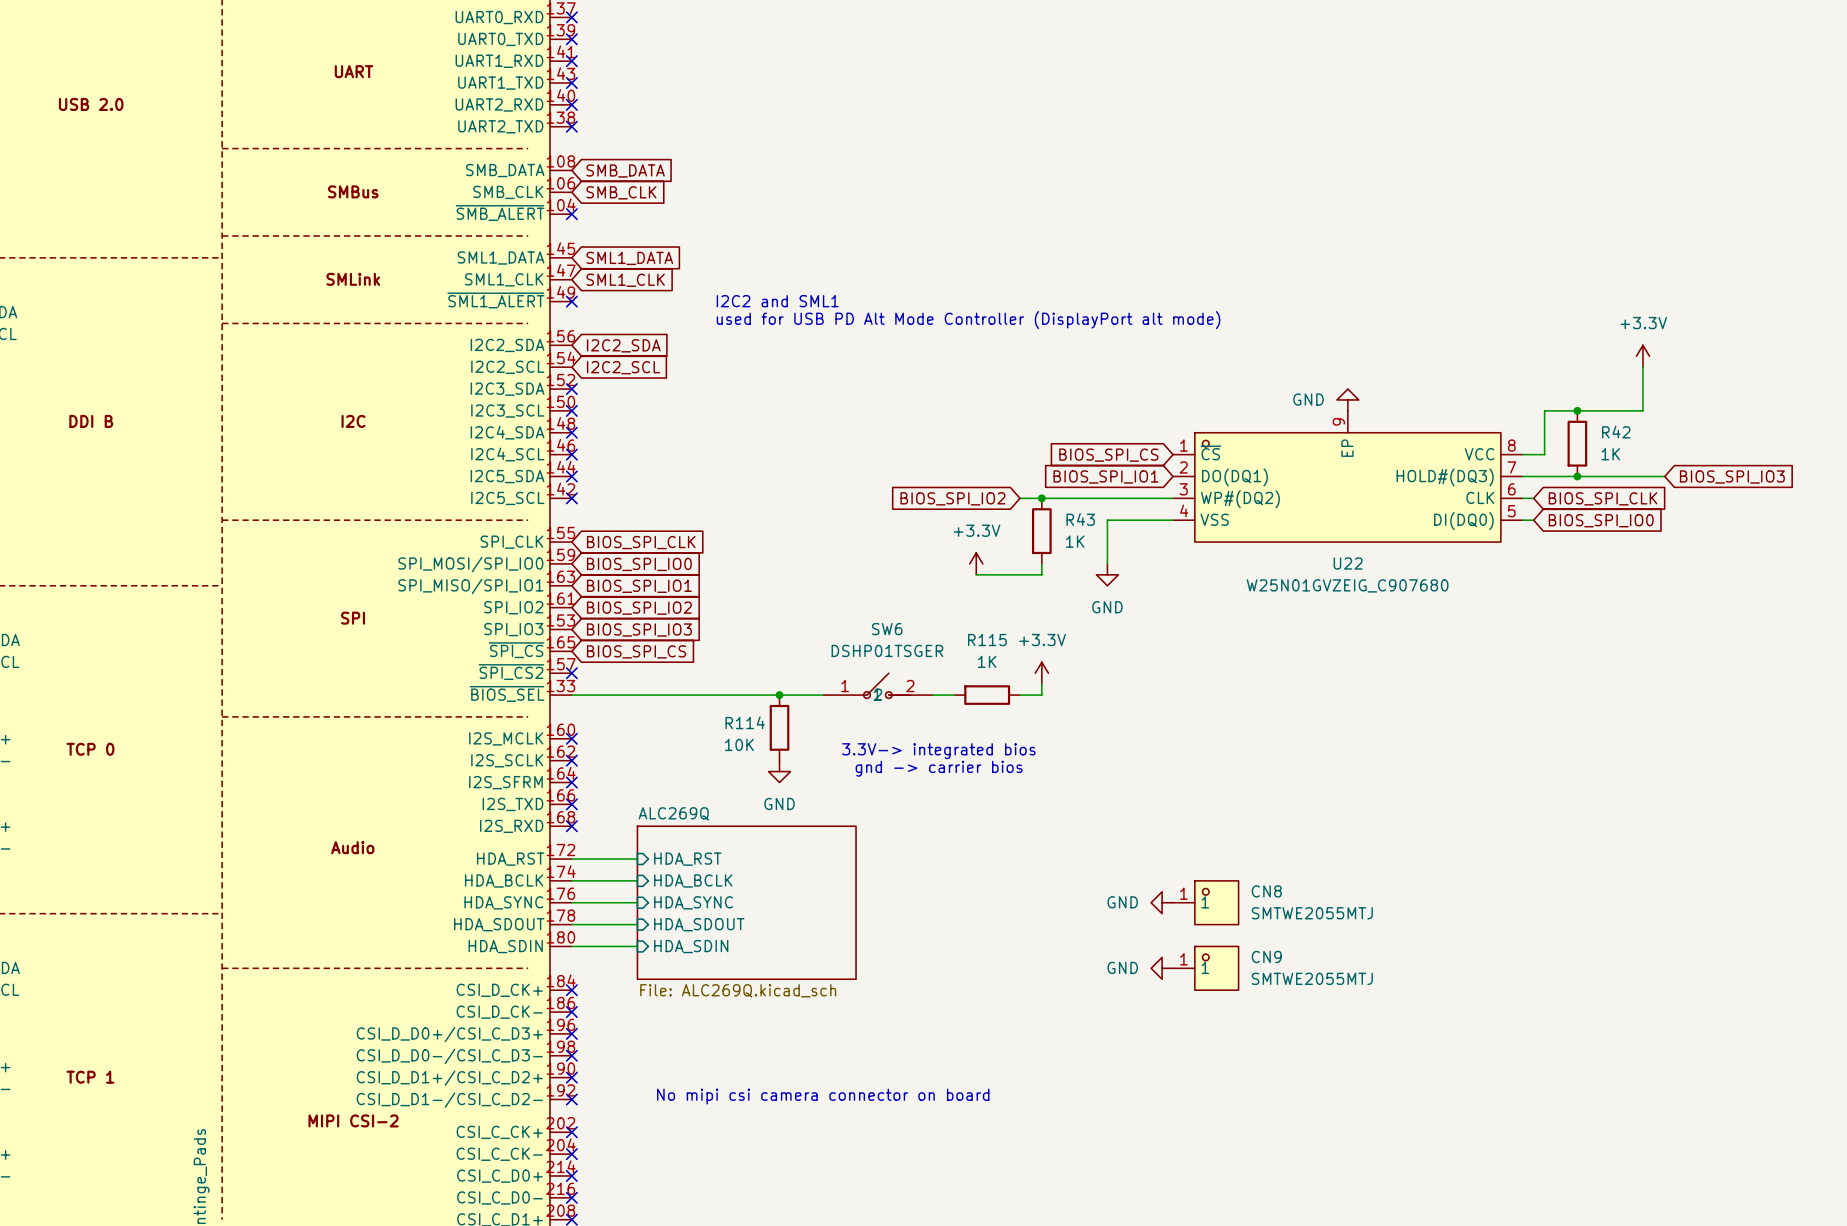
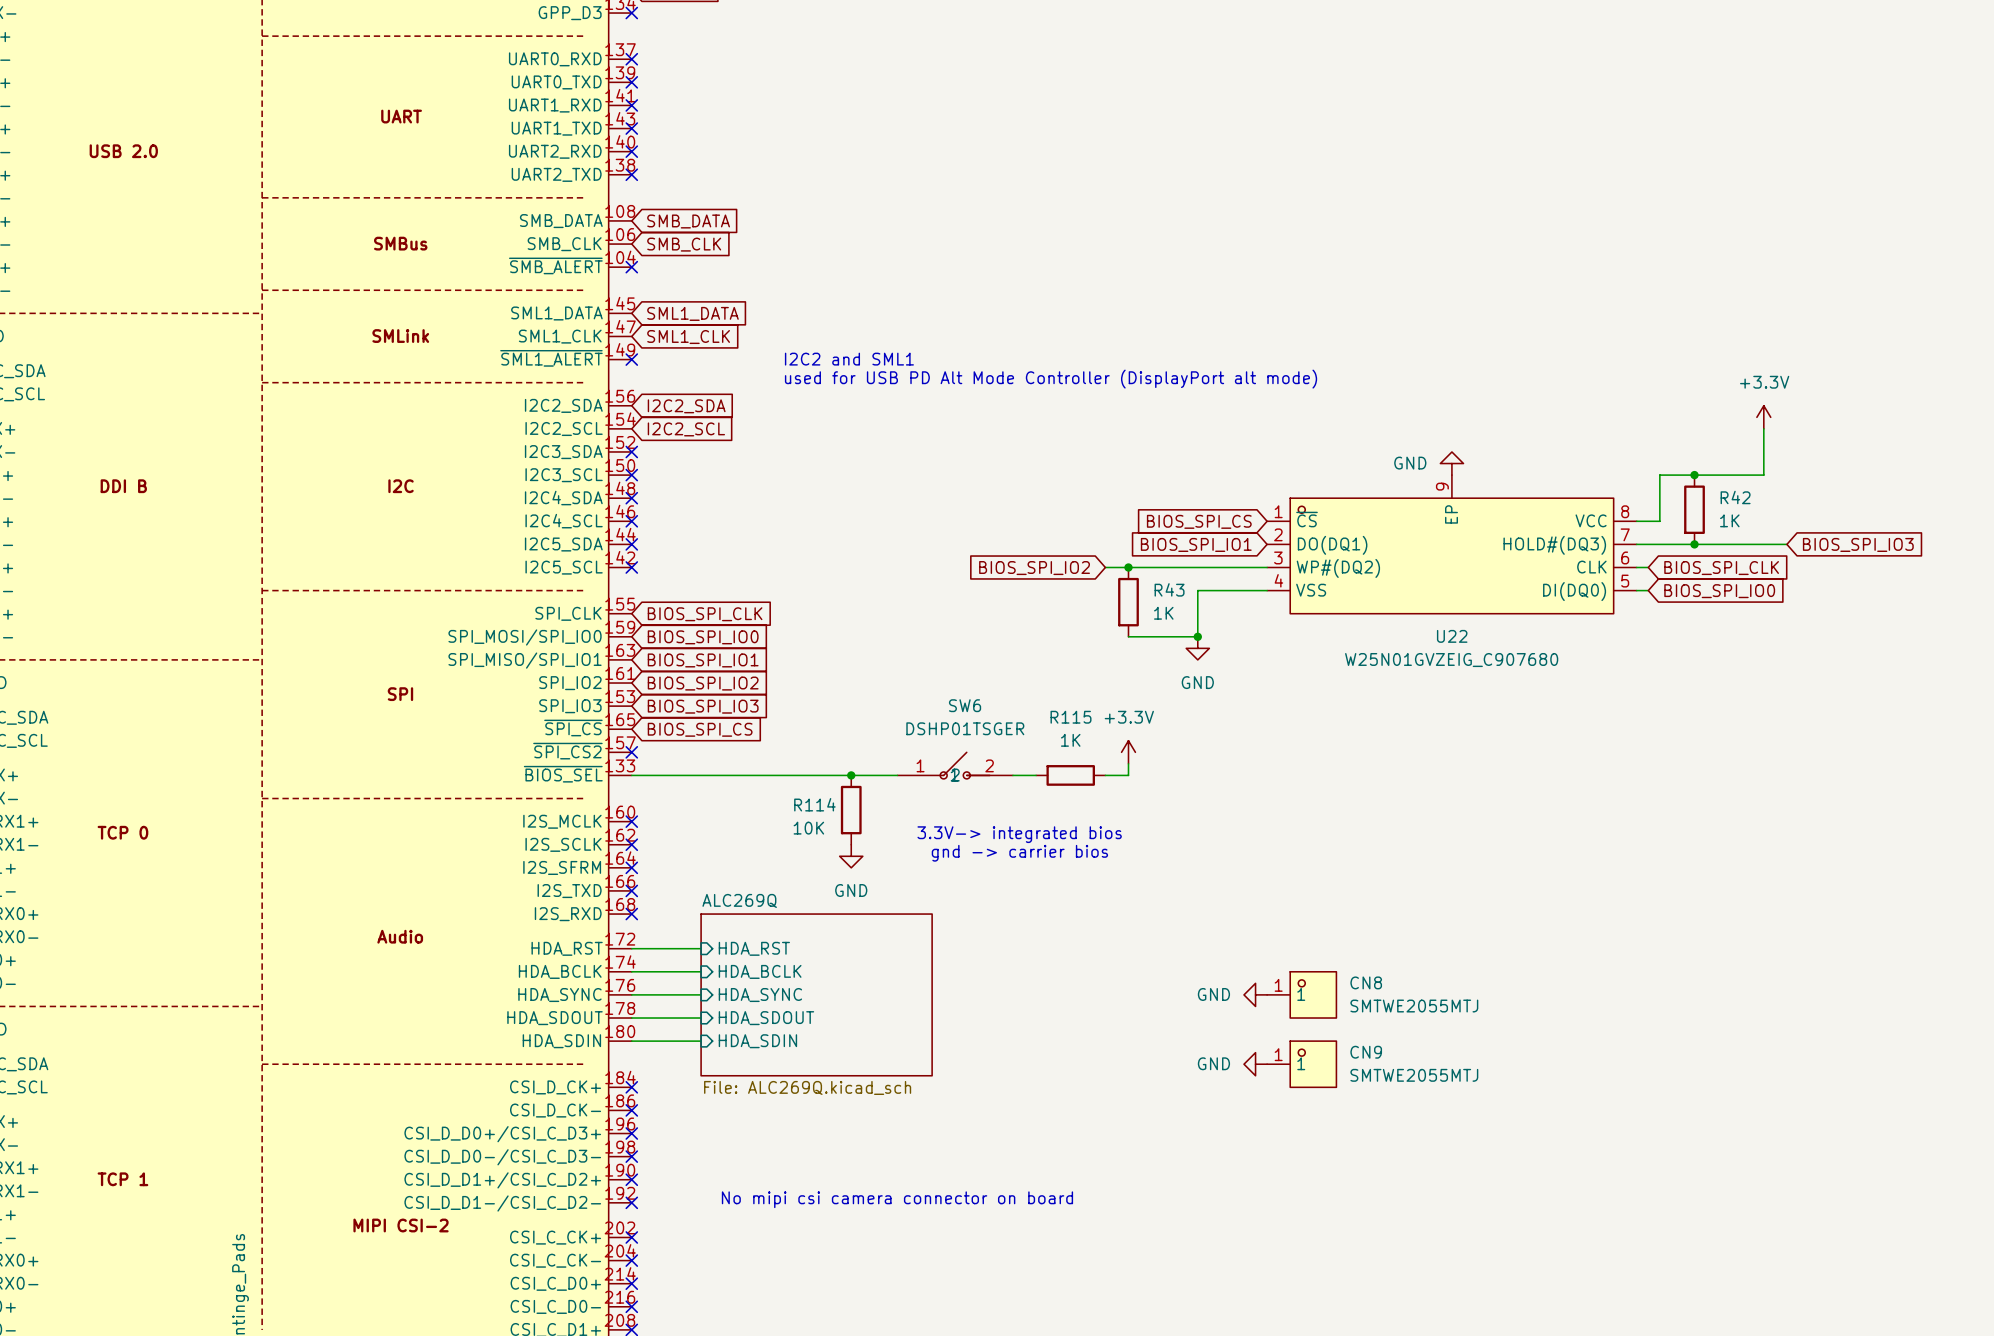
power symbol: +3.3V (976, 563) -> none
wire: (1041, 563) (1041, 574) (976, 574) -> (1128, 636) (1197, 636)
junction: none -> (1197, 636)

